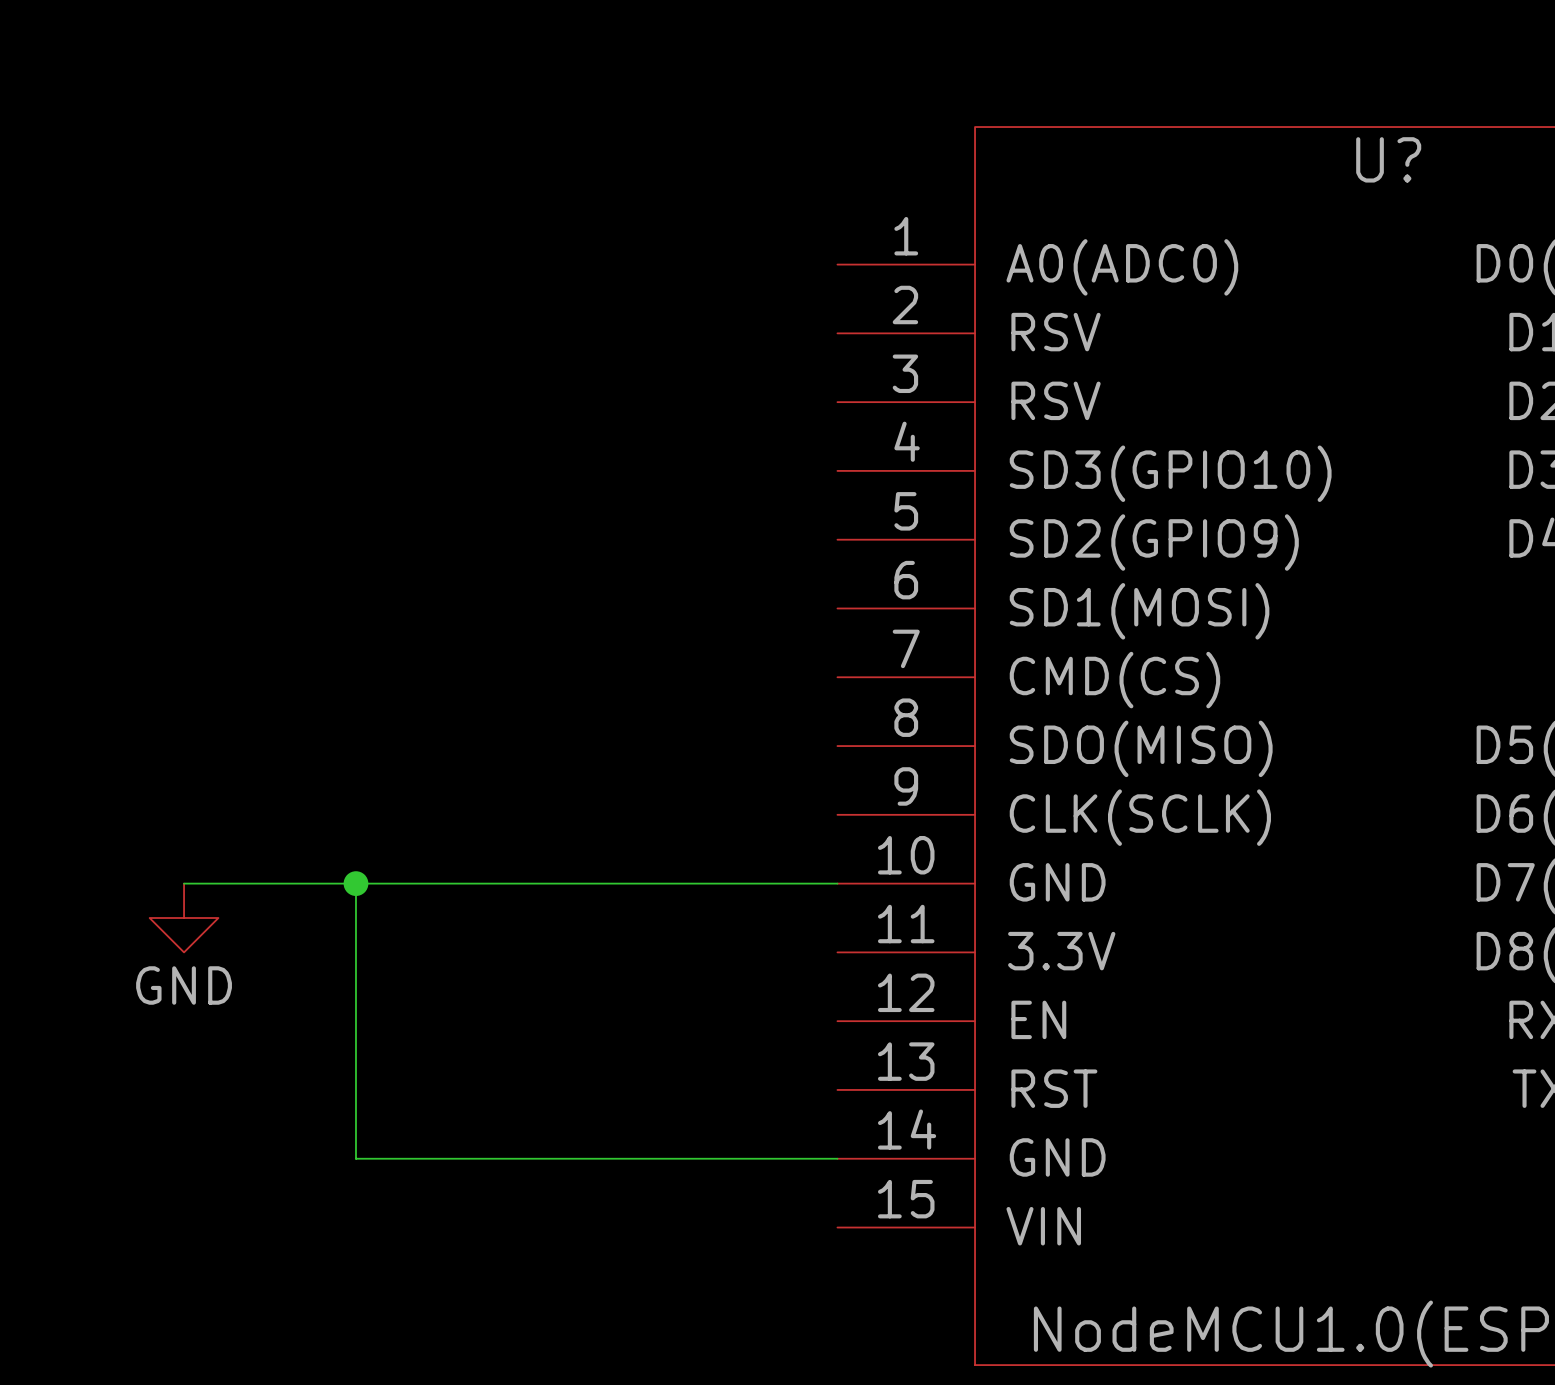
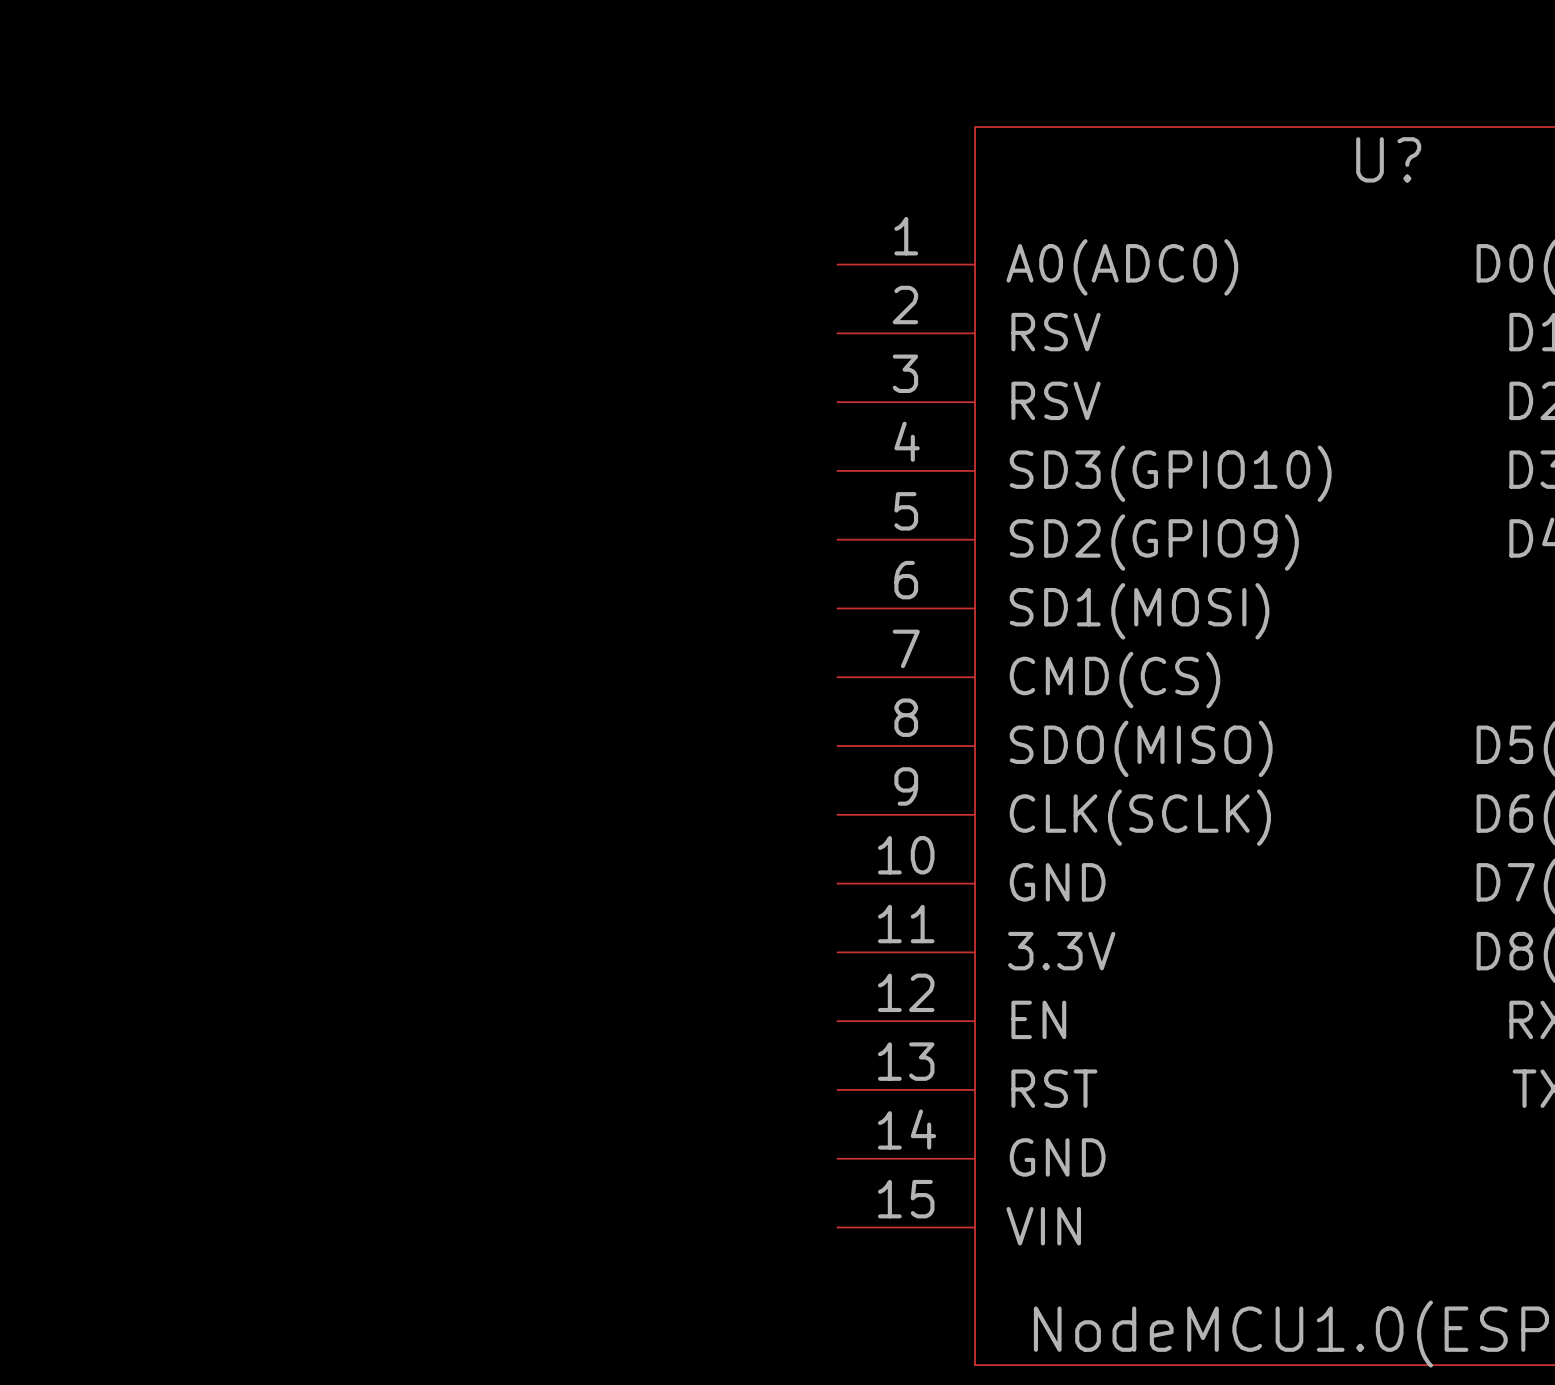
wire: (184, 883) (837, 883) -> none
wire: (355, 883) (355, 1158) (837, 1158) -> none
junction: (355, 883) -> none
power symbol: GND (184, 918) -> none

